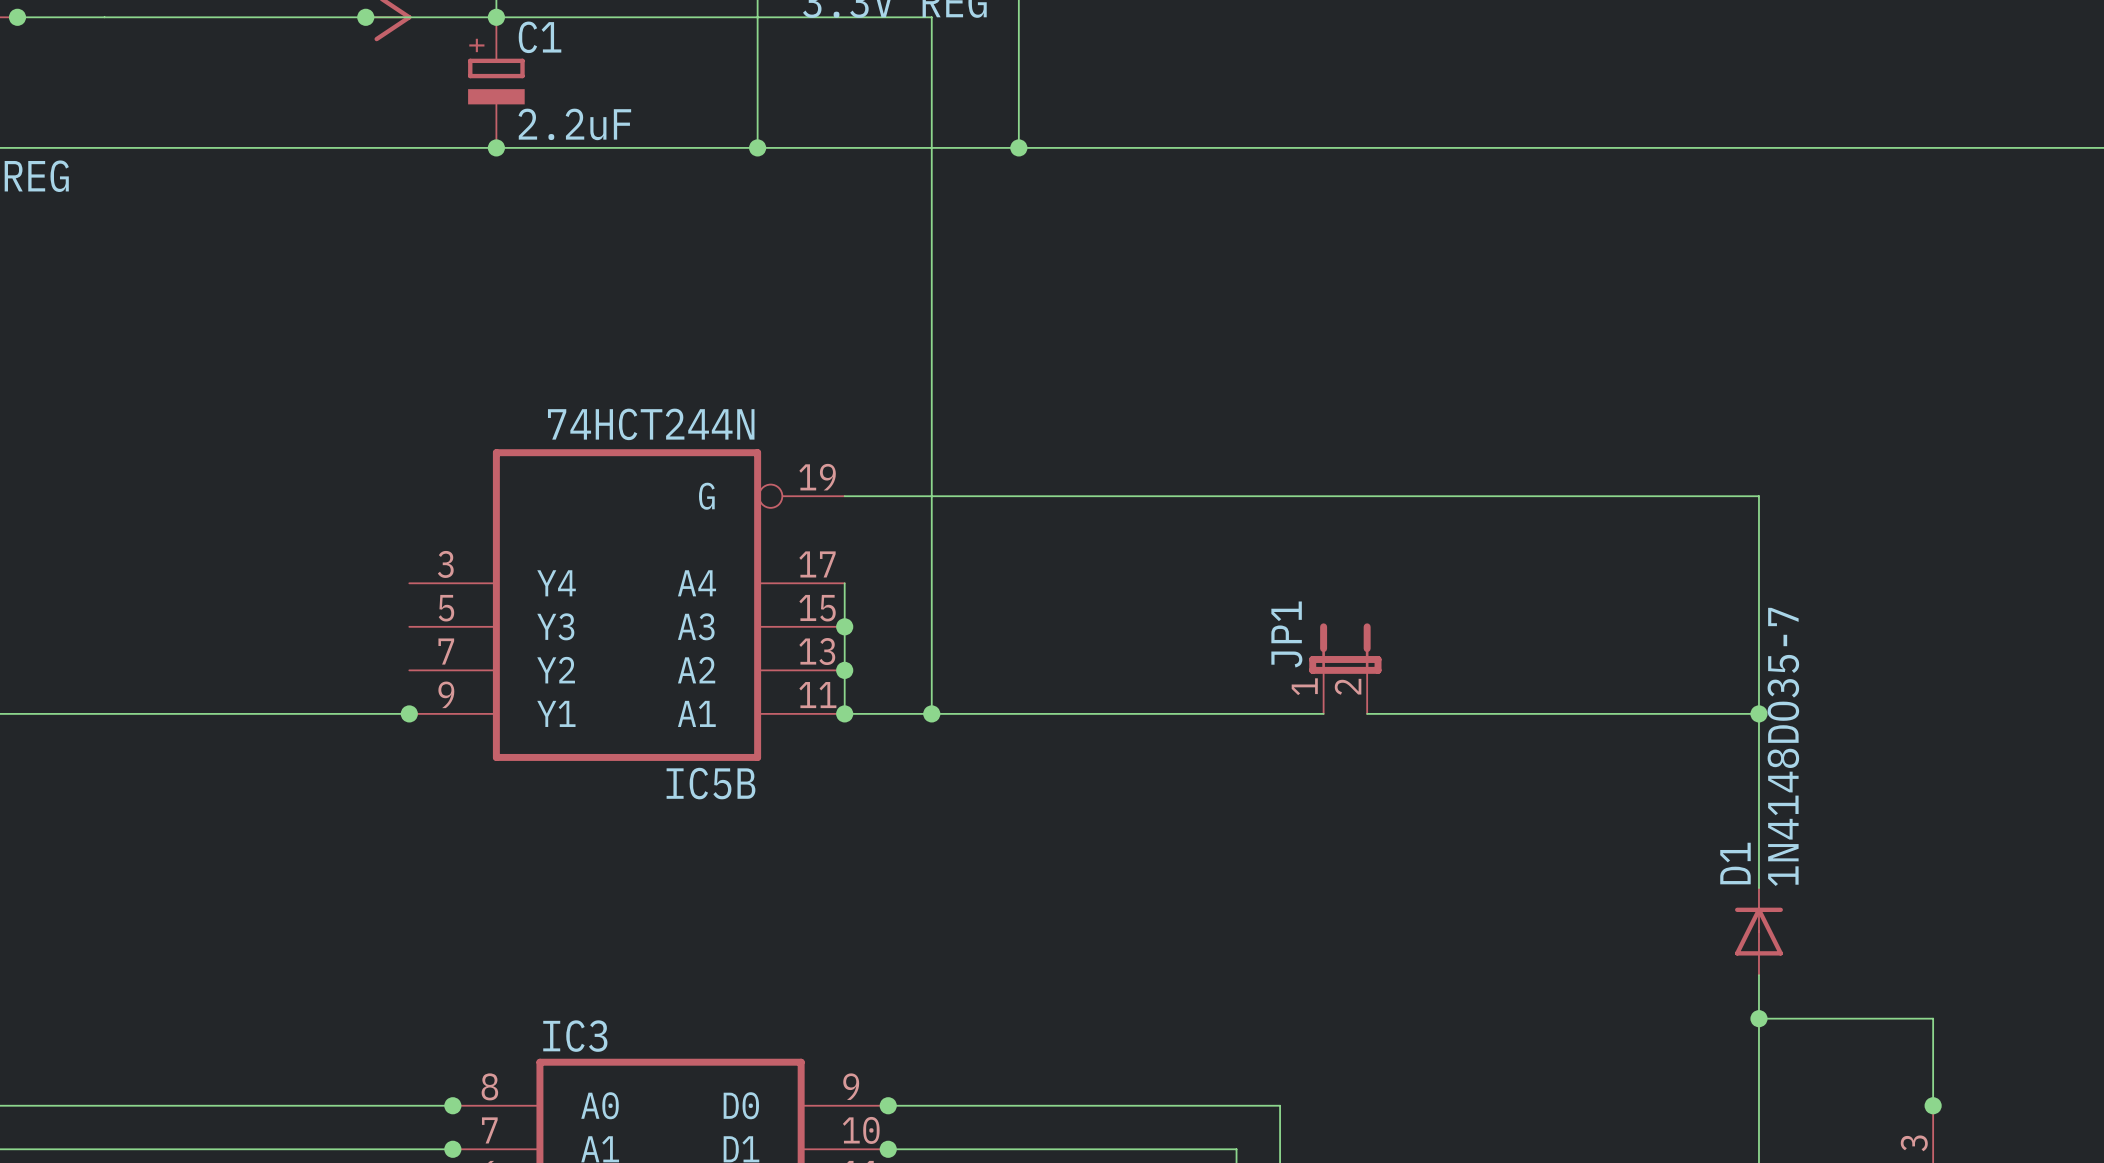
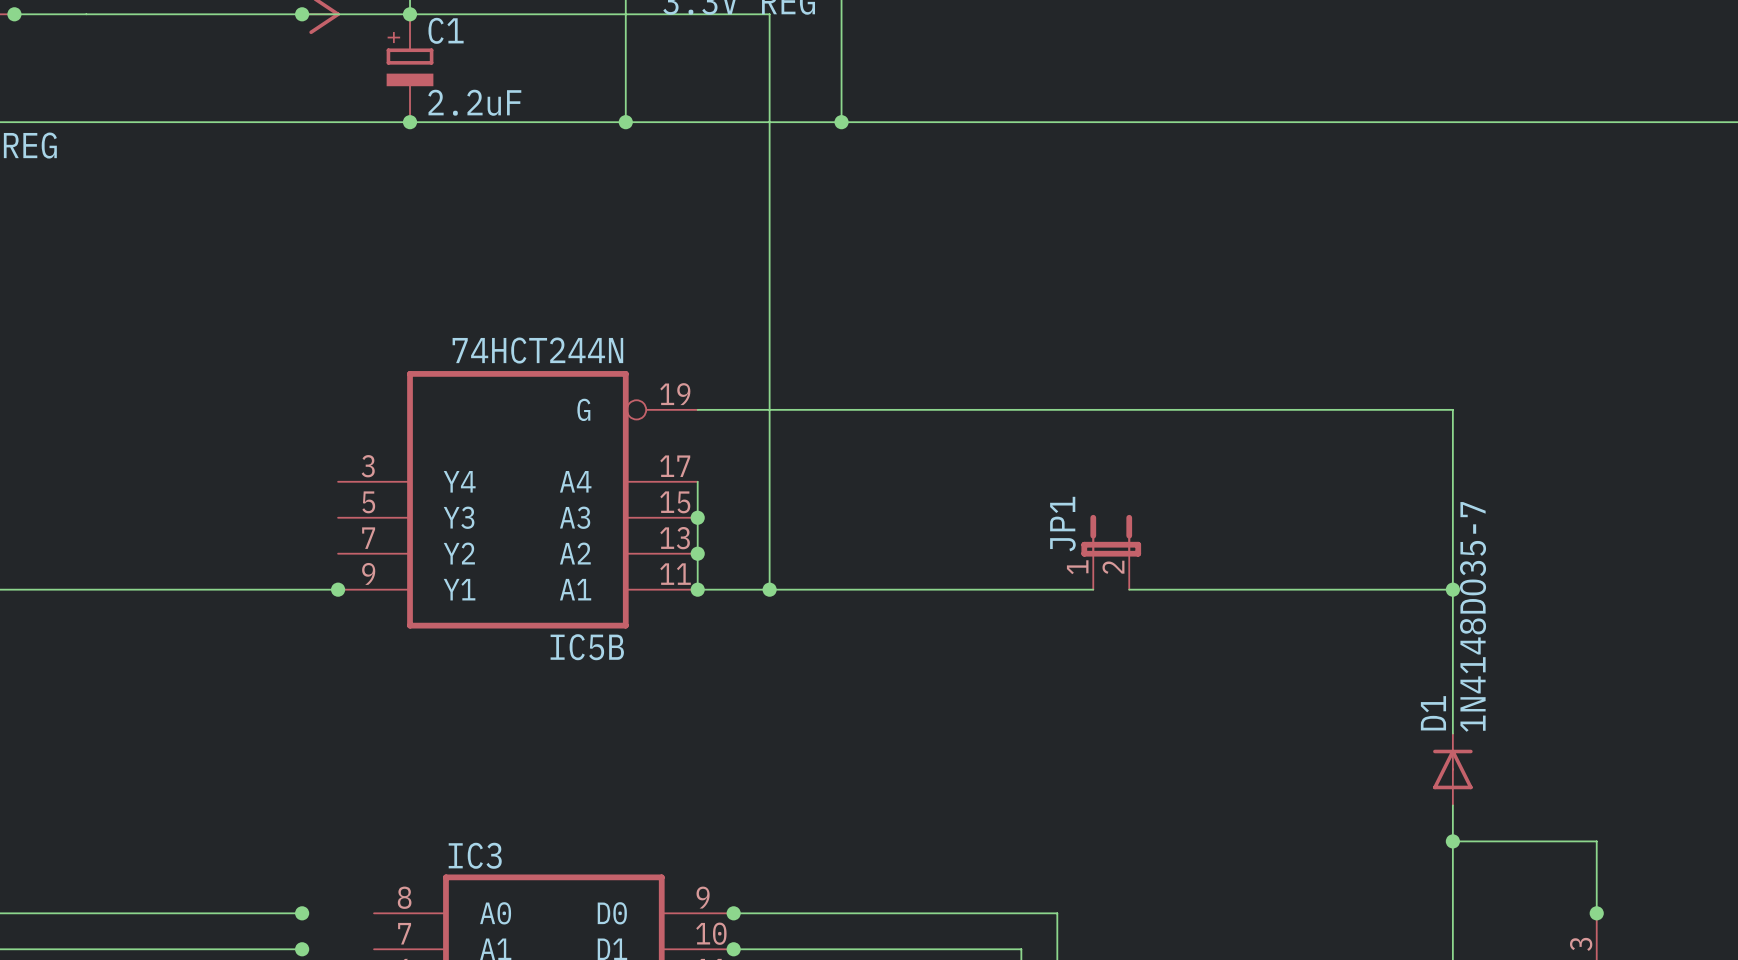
wire: (365, 1105) (452, 1105) -> none
junction: none -> (302, 913)
junction: (452, 1105) -> none
wire: (365, 1149) (452, 1149) -> none
junction: none -> (302, 949)
junction: (452, 1149) -> none

